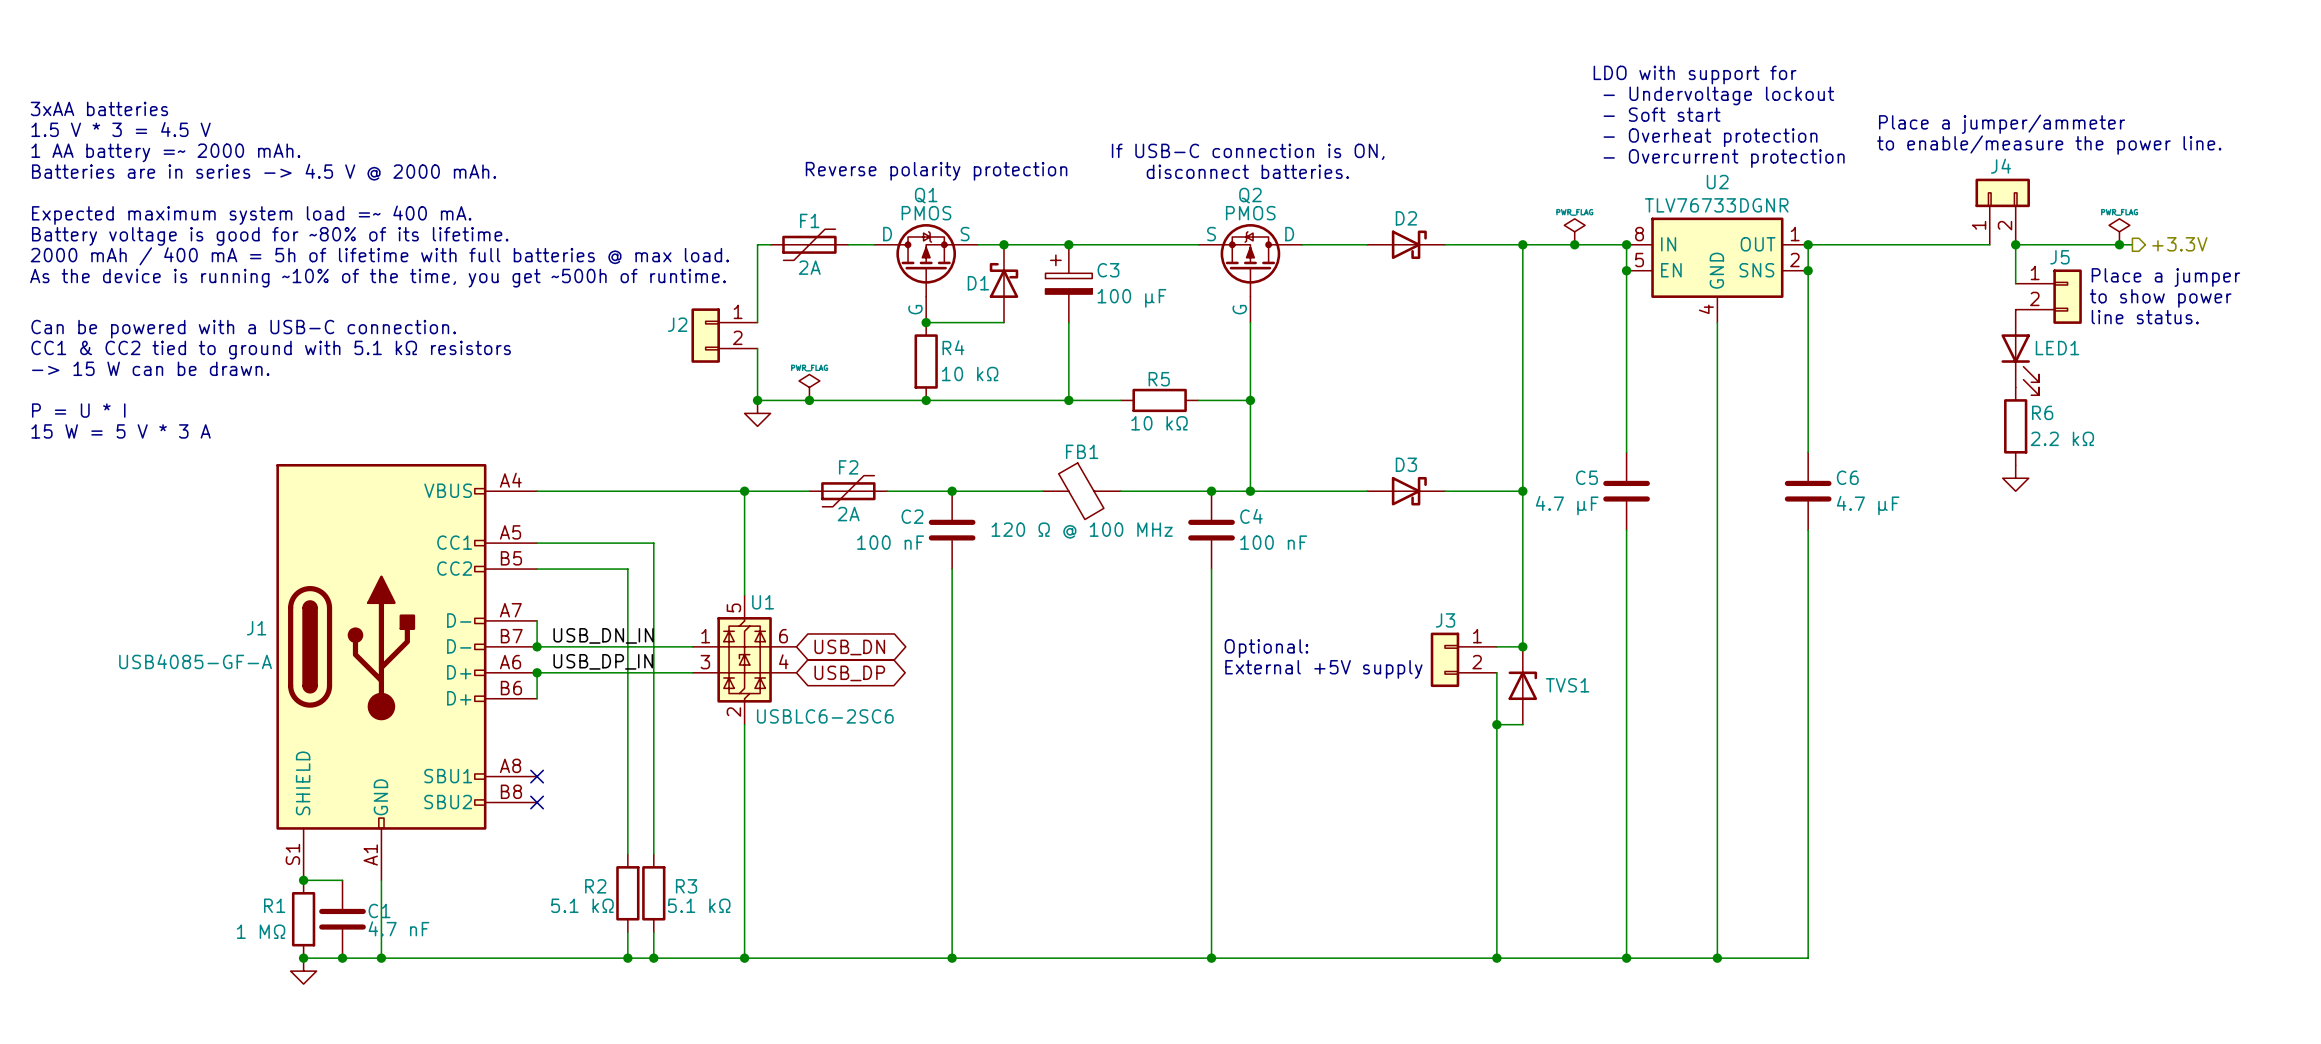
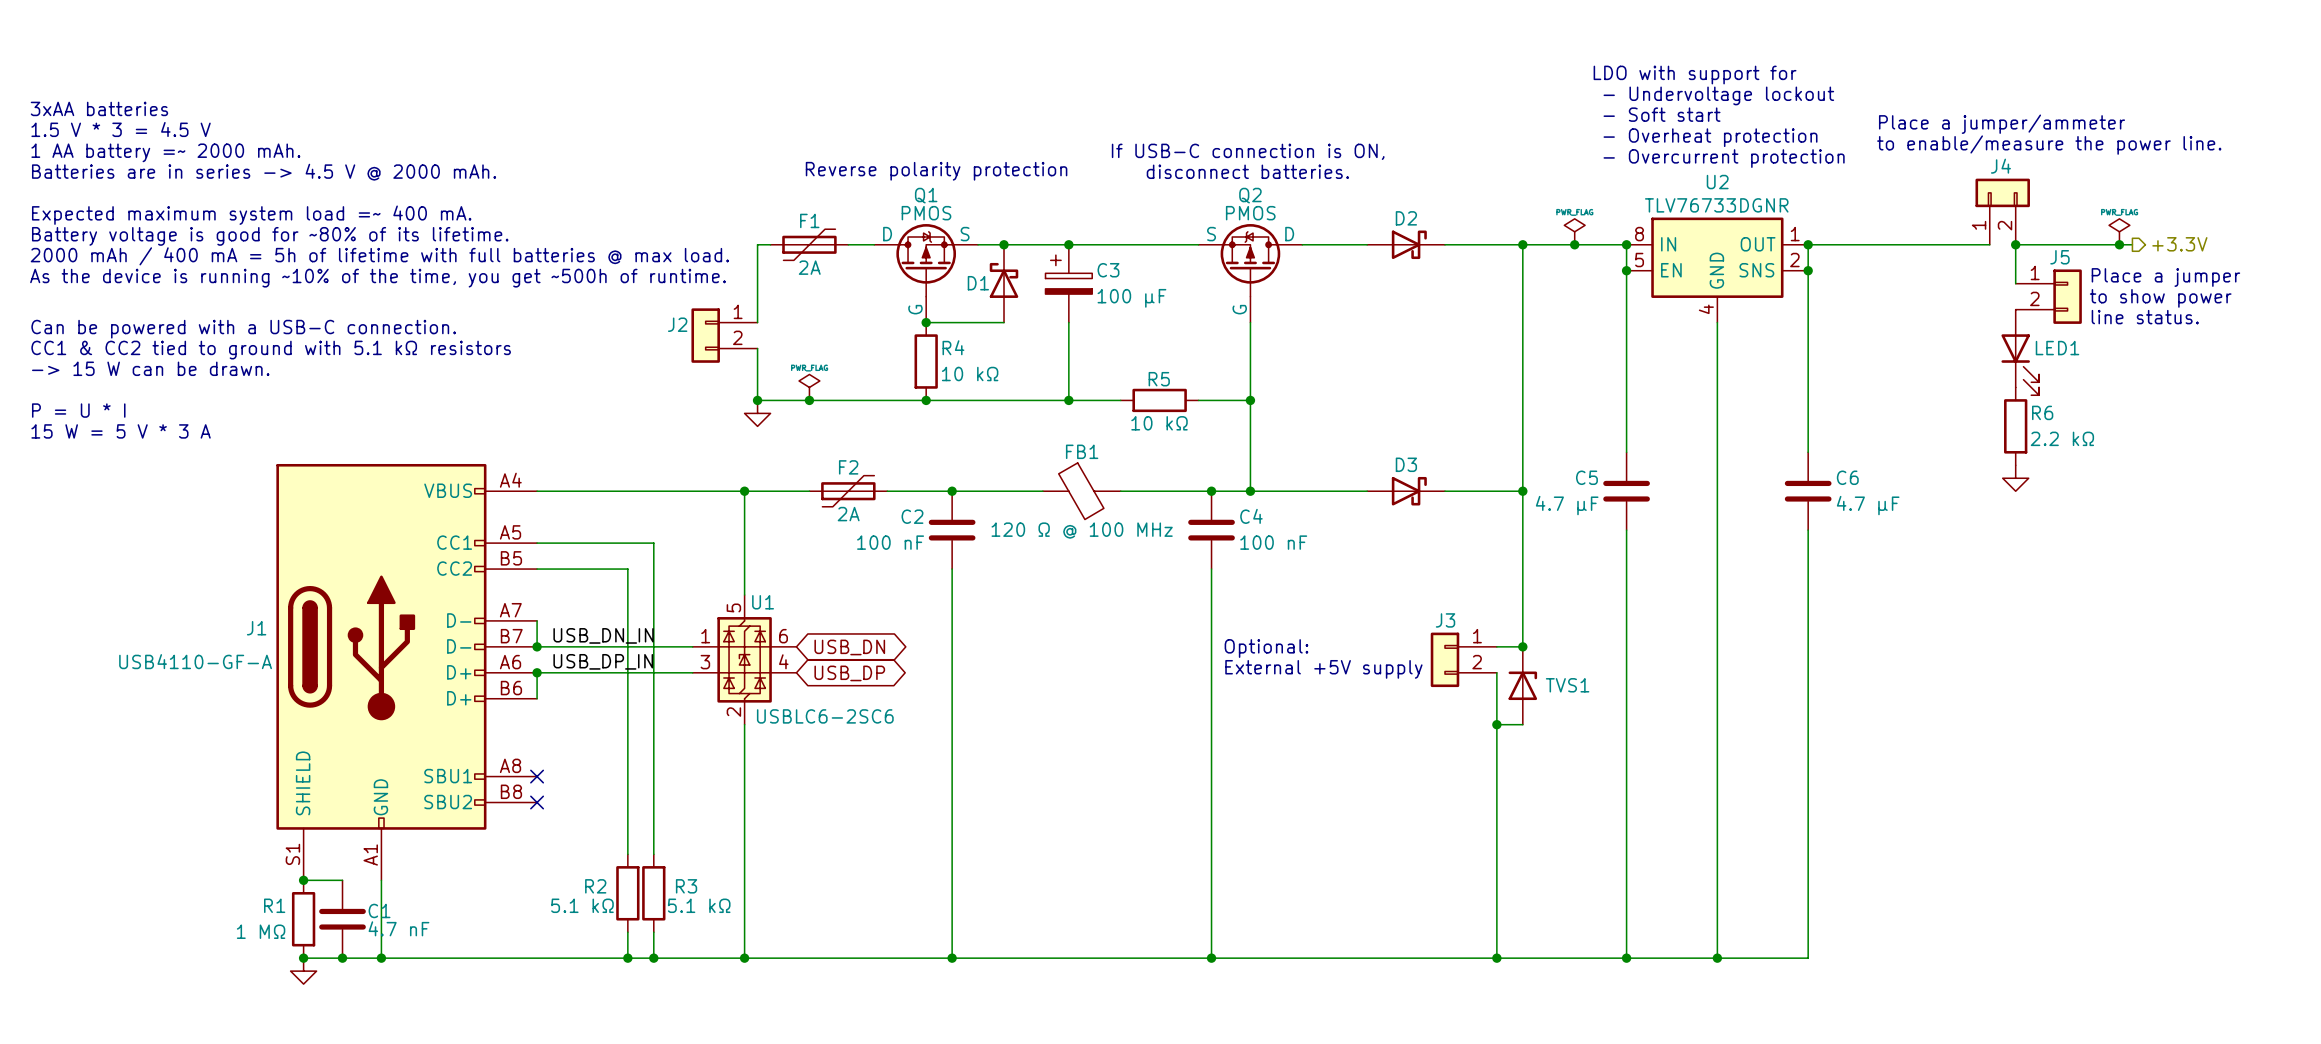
J1 value: USB4085-GF-A (195, 661) -> USB4110-GF-A (195, 661)

